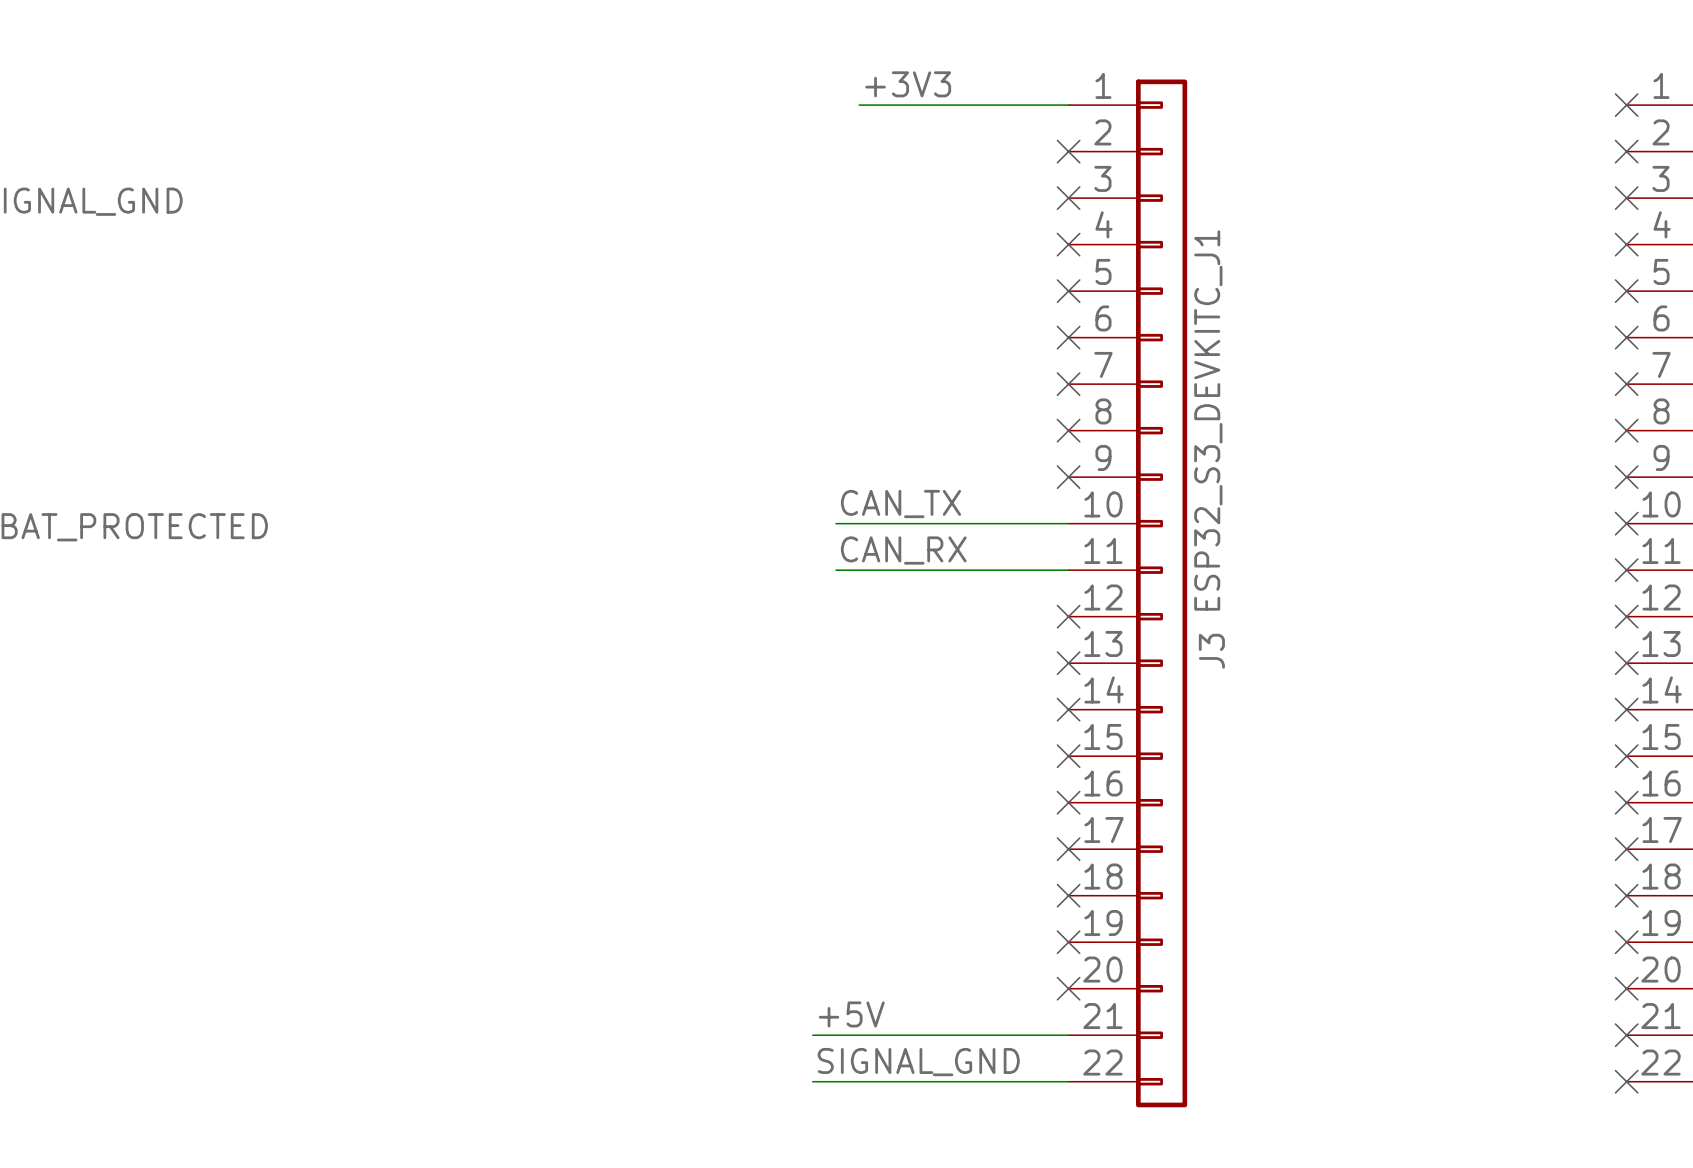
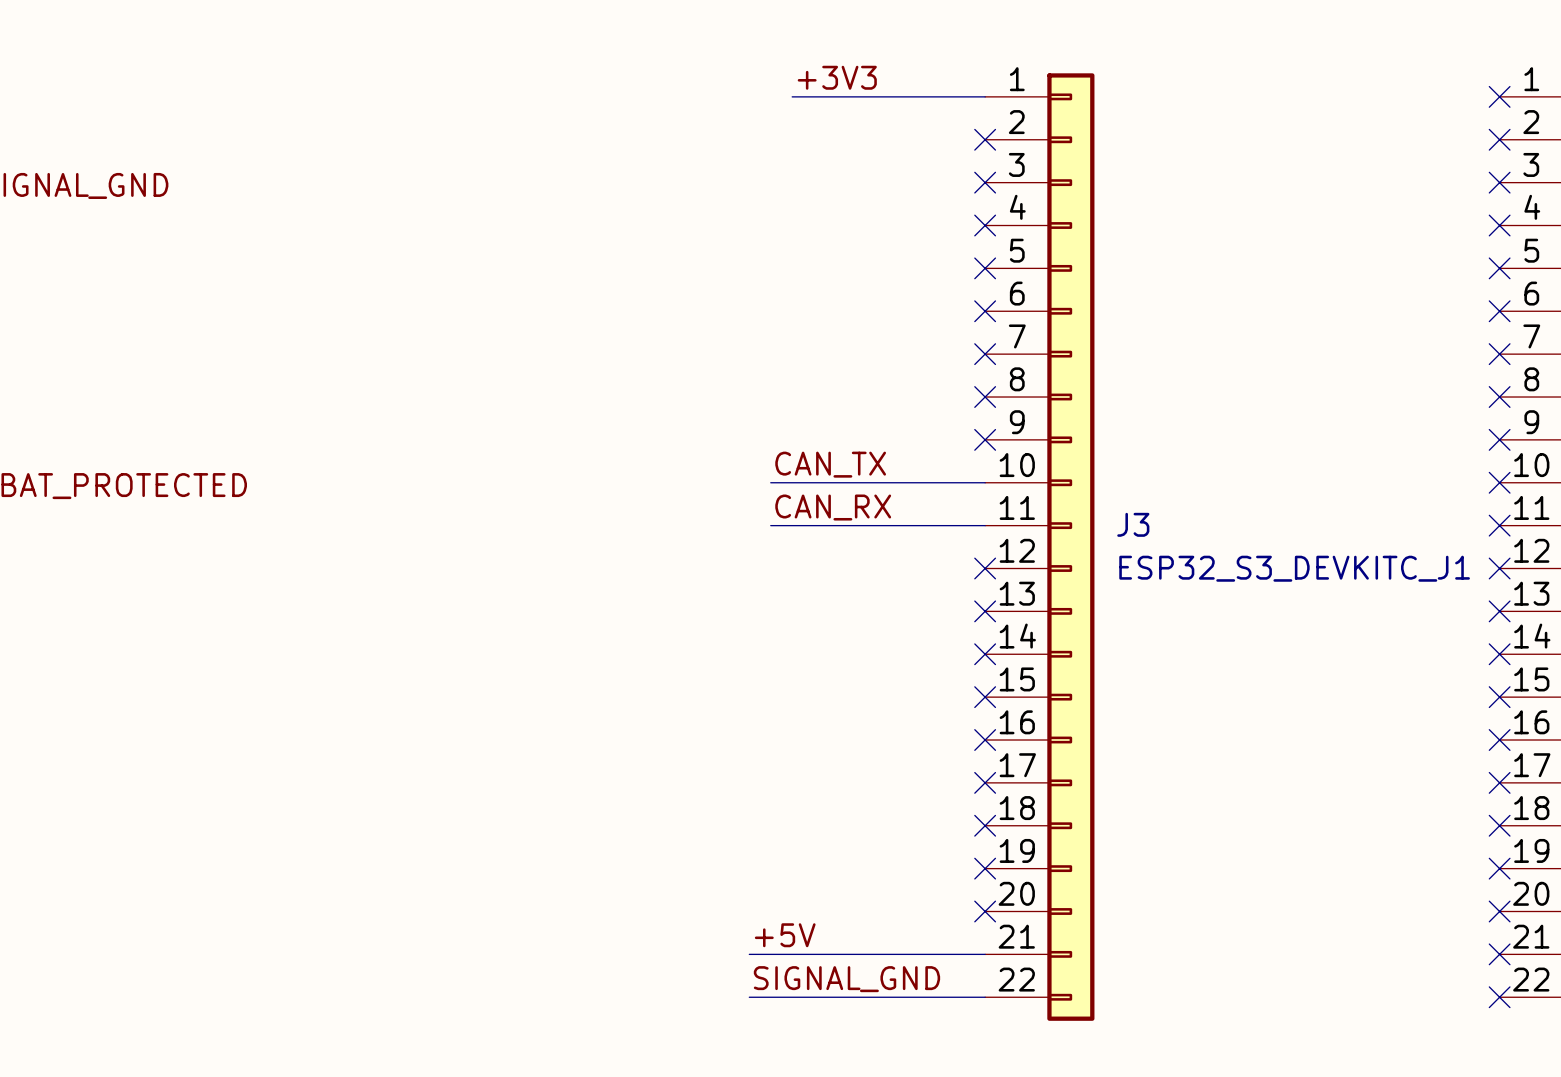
J3 value rotation: 0° (1208, 420) -> 90° clockwise (1294, 568)
J3 name rotation: 0° (1211, 651) -> 90° clockwise (1133, 524)
J3 name position: J3 (1211, 651) -> J3 (1133, 524)

